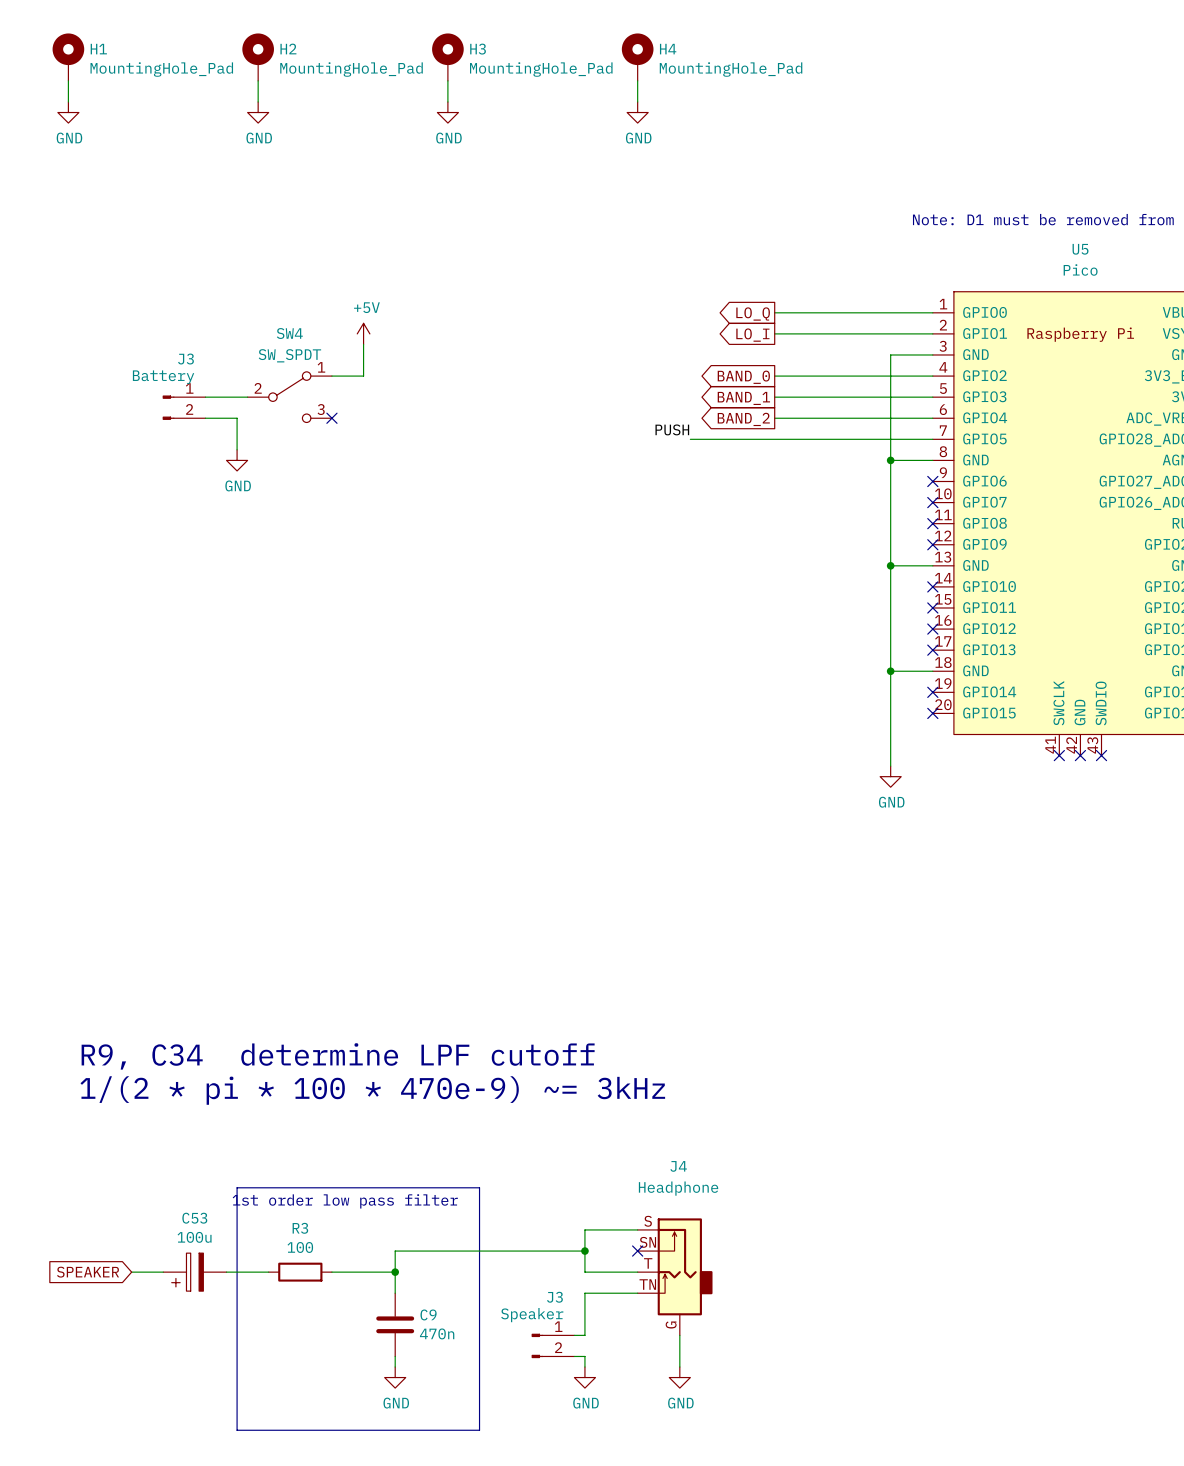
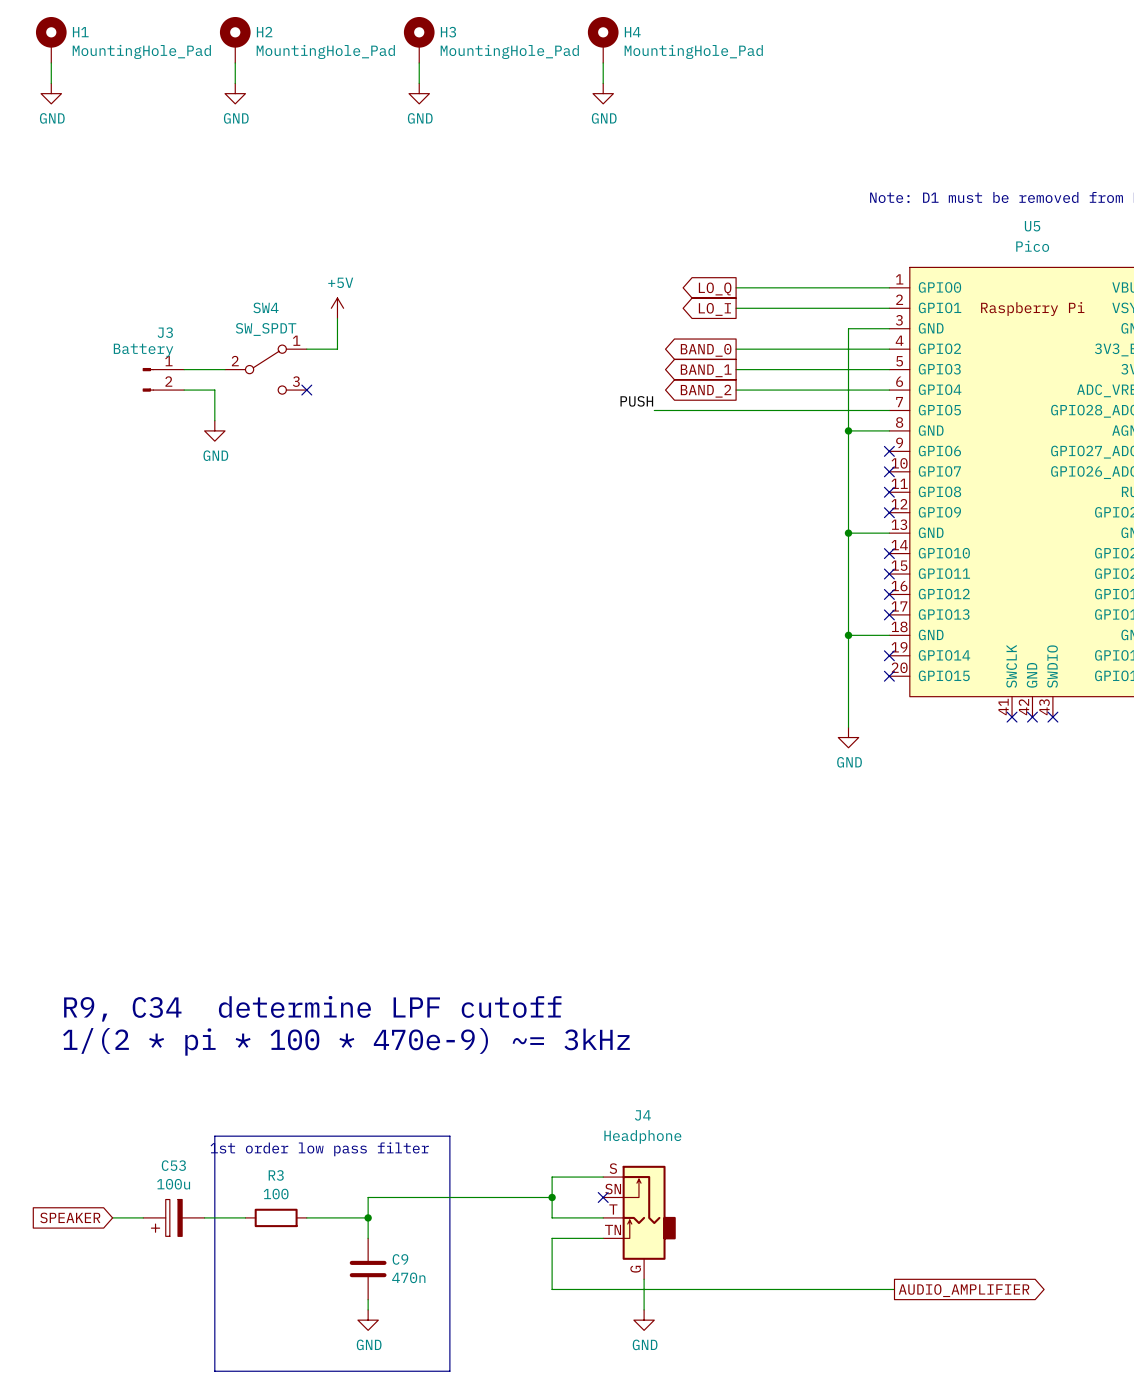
wire: (574, 1335) (584, 1335) -> (894, 1289) (552, 1289) (552, 1279)
J3: Speaker (553, 1345) -> none
global label: none -> AUDIO_AMPLIFIER (964, 1290)
wire: (574, 1356) (584, 1356) (584, 1367) -> none
power symbol: GND (584, 1377) -> none

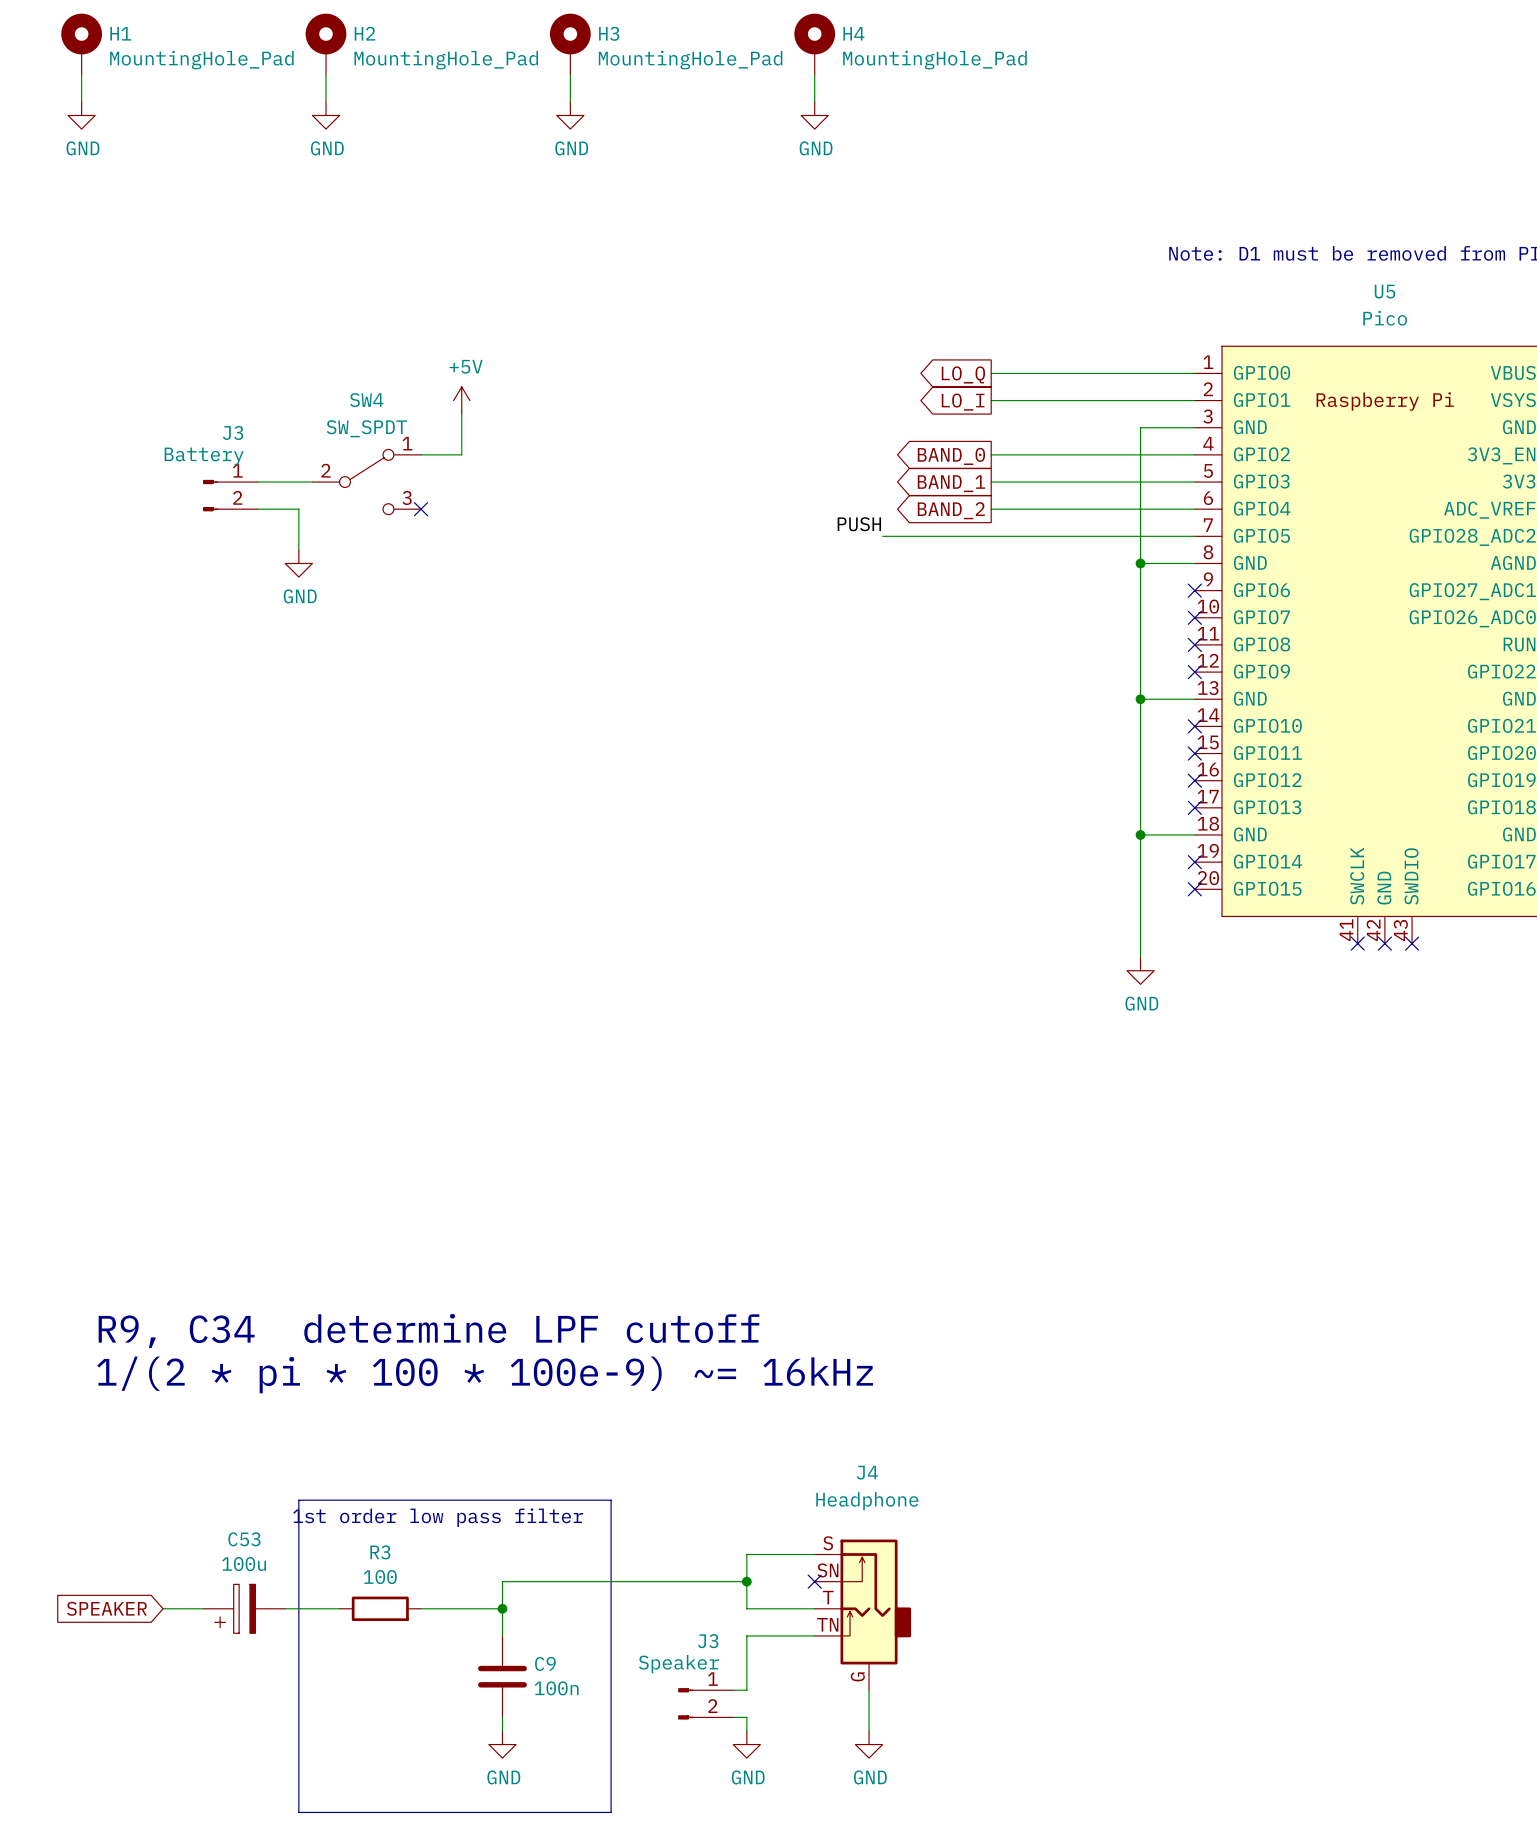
text: 1/(2 * pi * 100 * 470e-9) ~= 3kHz (346, 1041) -> 1/(2 * pi * 100 * 100e-9) ~= 16kHz (485, 1374)
C9 value: 470n (408, 1277) -> 100n (556, 1688)
wire: (552, 1279) (552, 1289) (894, 1289) -> (746, 1690) (733, 1690)
J3: none -> Speaker (705, 1703)
global label: AUDIO_AMPLIFIER (964, 1290) -> none
wire: none -> (733, 1717) (746, 1717) (746, 1730)
power symbol: none -> GND (746, 1744)

